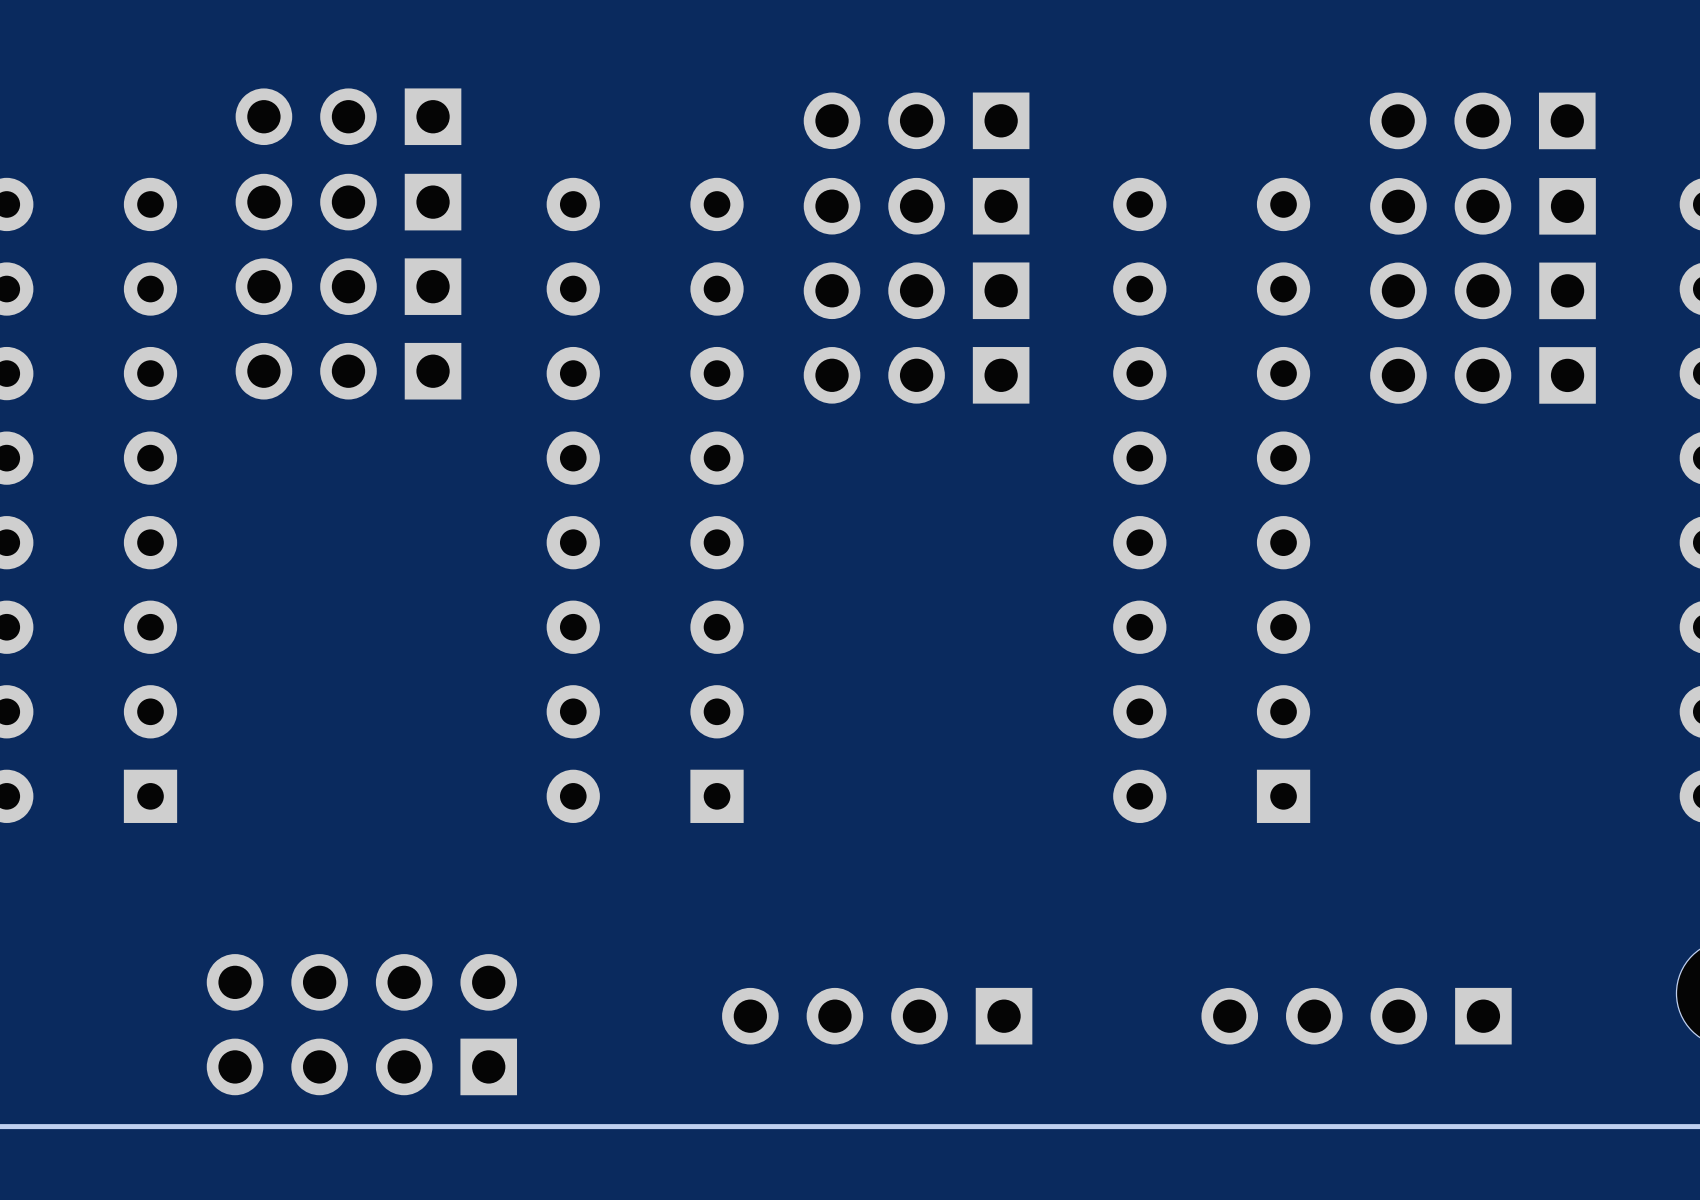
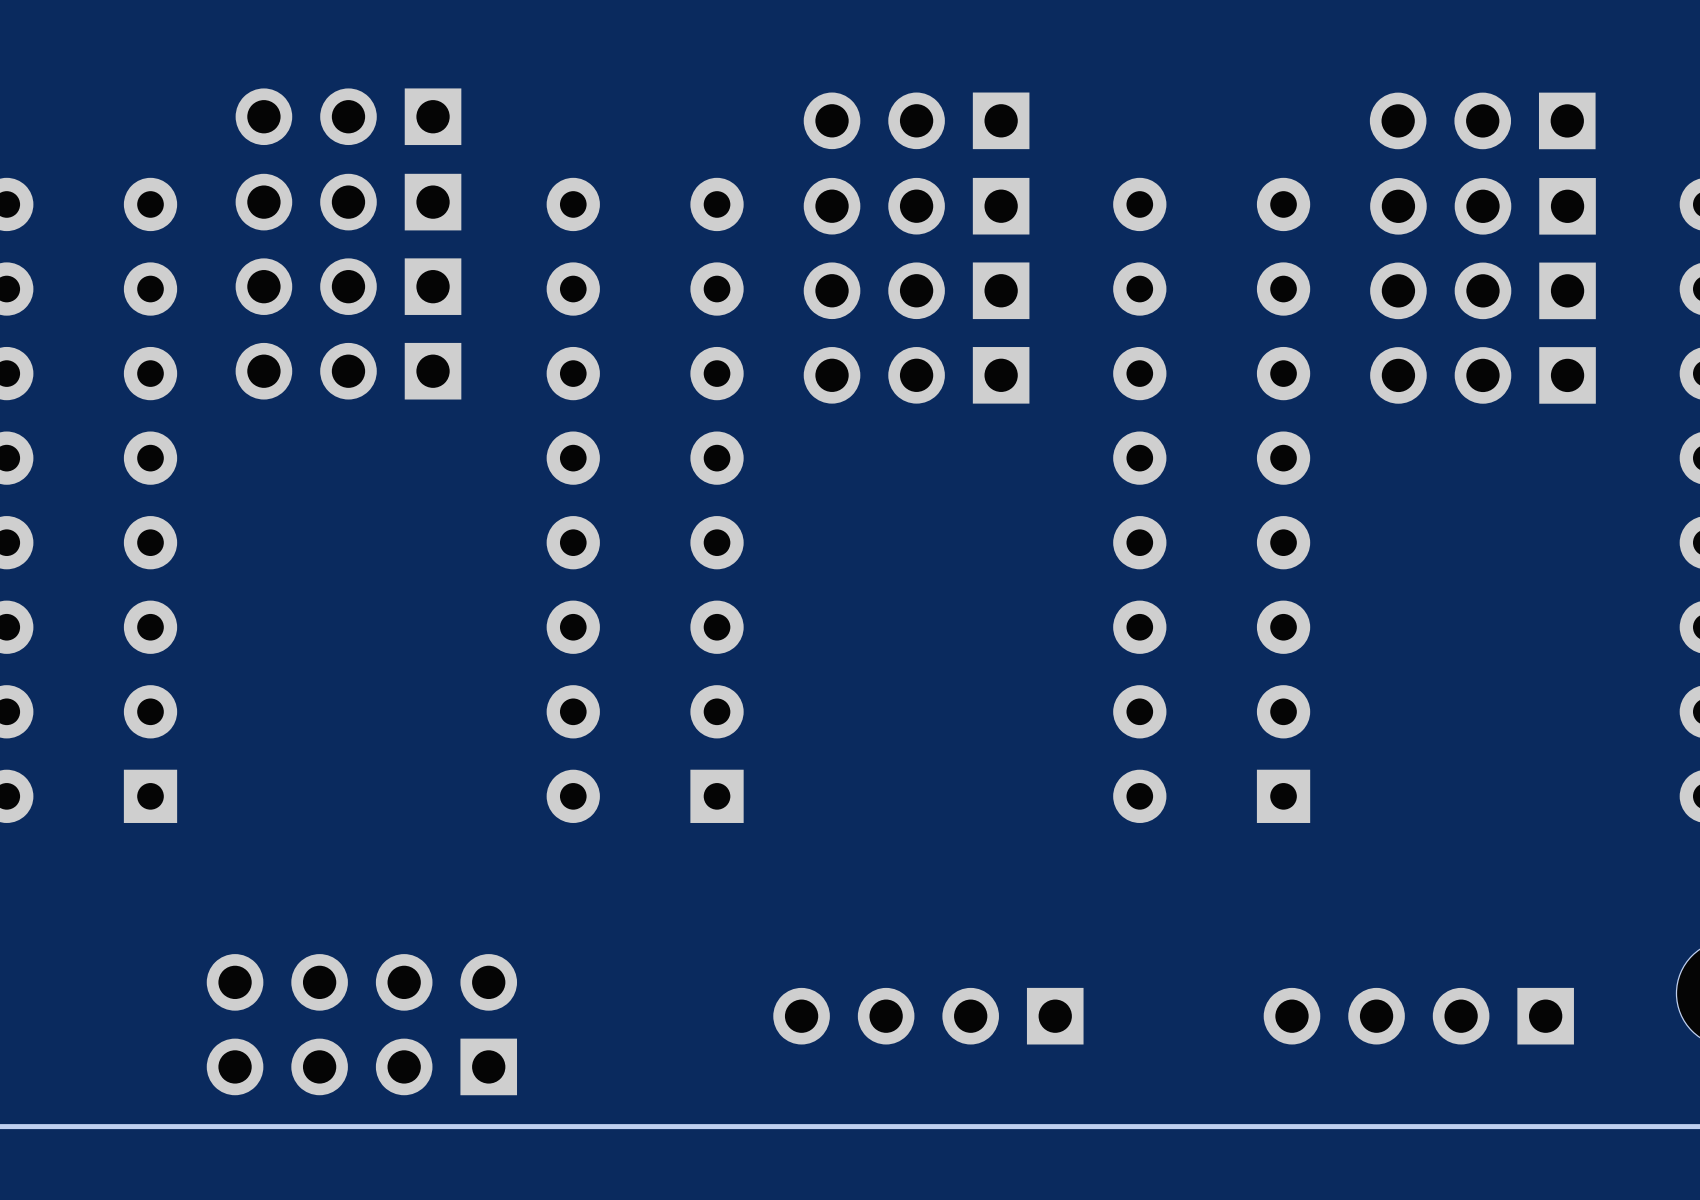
part position: (877, 1016) -> (928, 1016)
part position: (1356, 1016) -> (1418, 1016)

